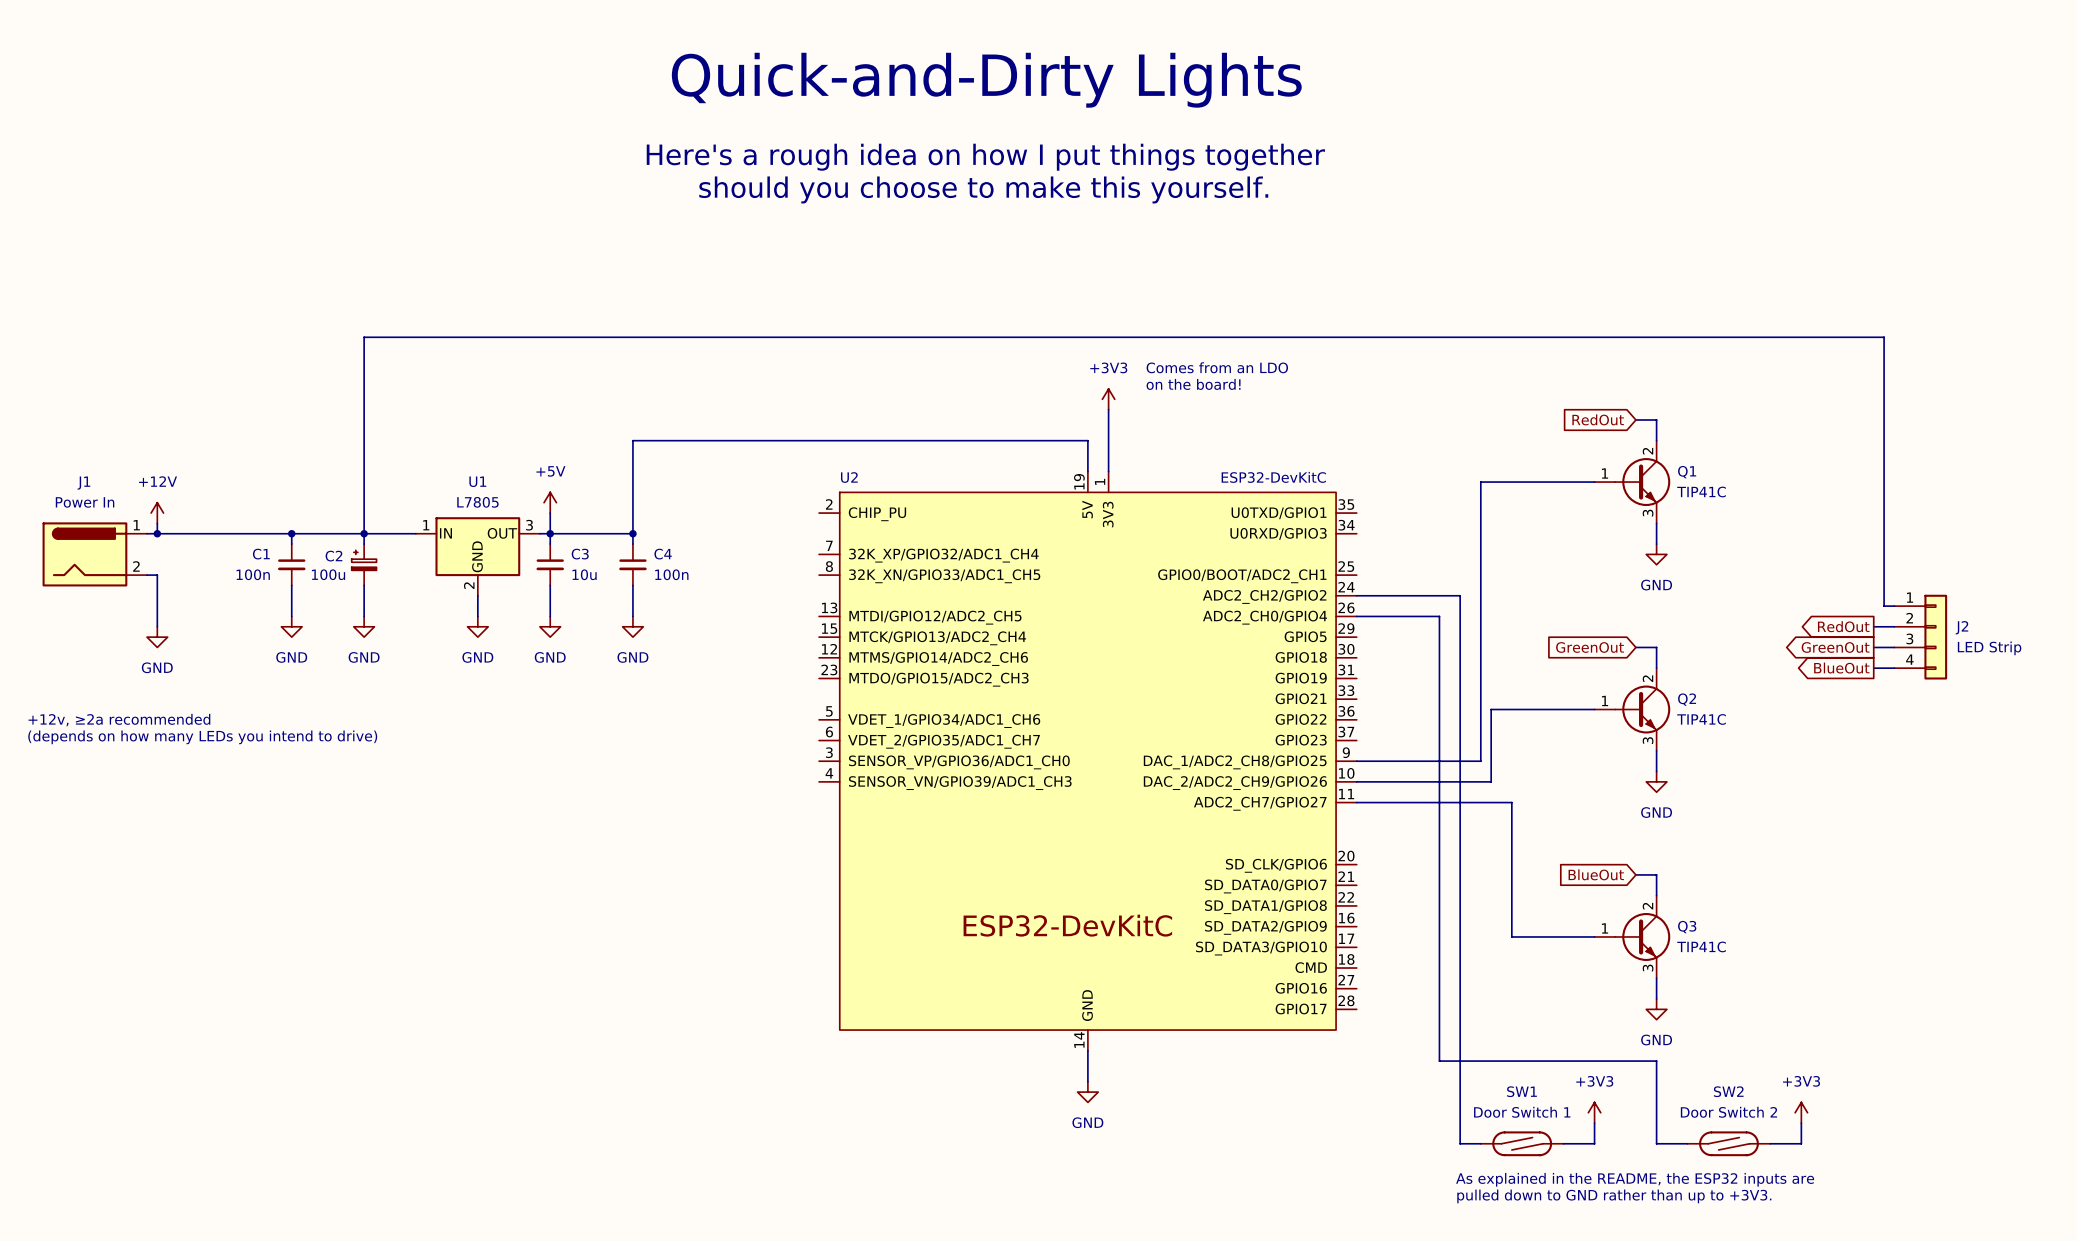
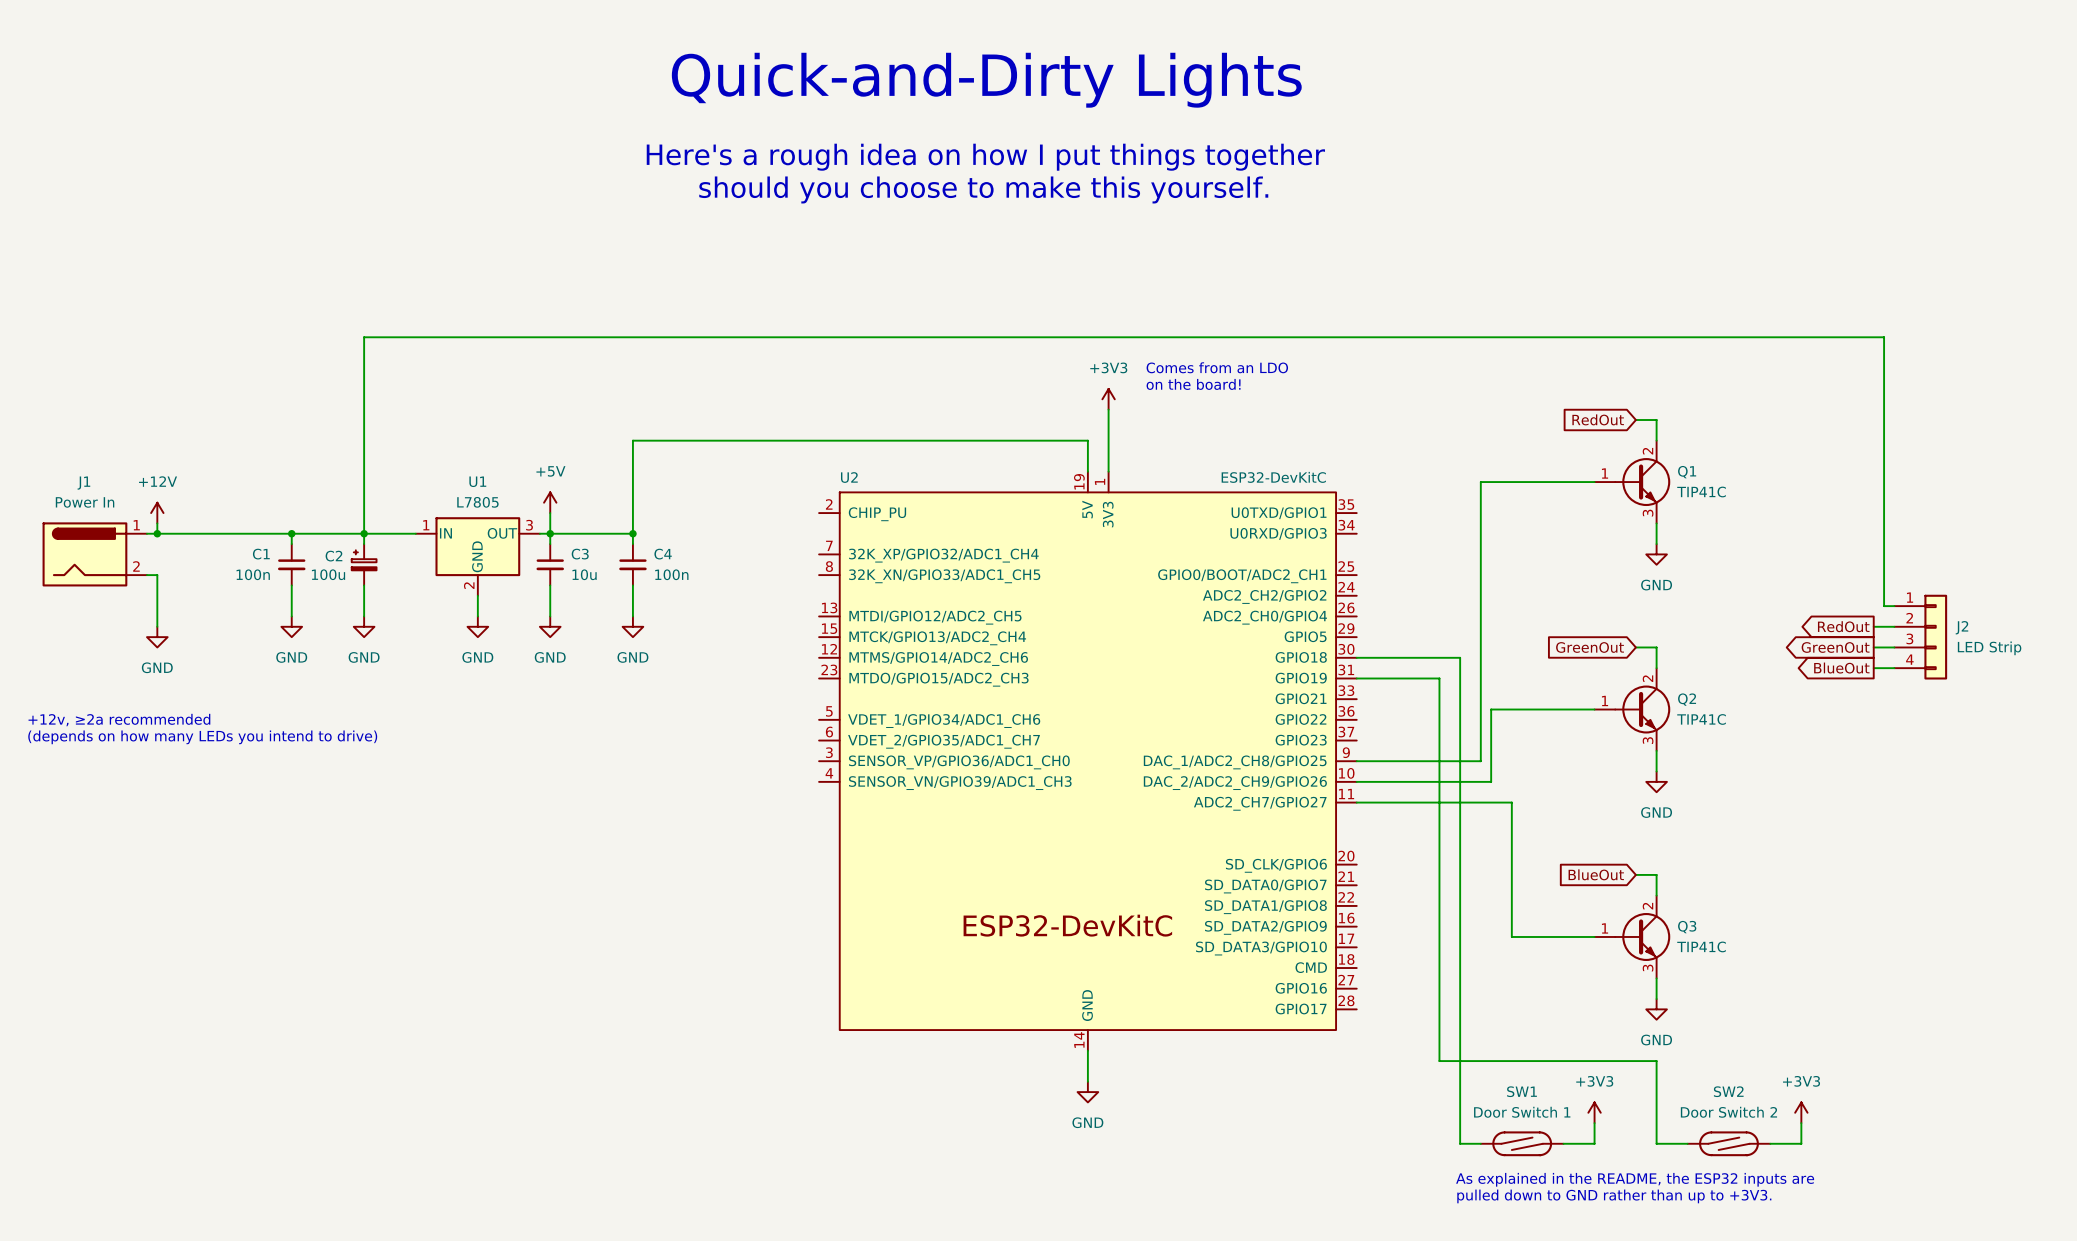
wire: (1356, 595) (1460, 595) (1460, 657) -> (1356, 657) (1460, 657)
wire: (1356, 616) (1439, 616) (1439, 678) -> (1356, 678) (1439, 678)

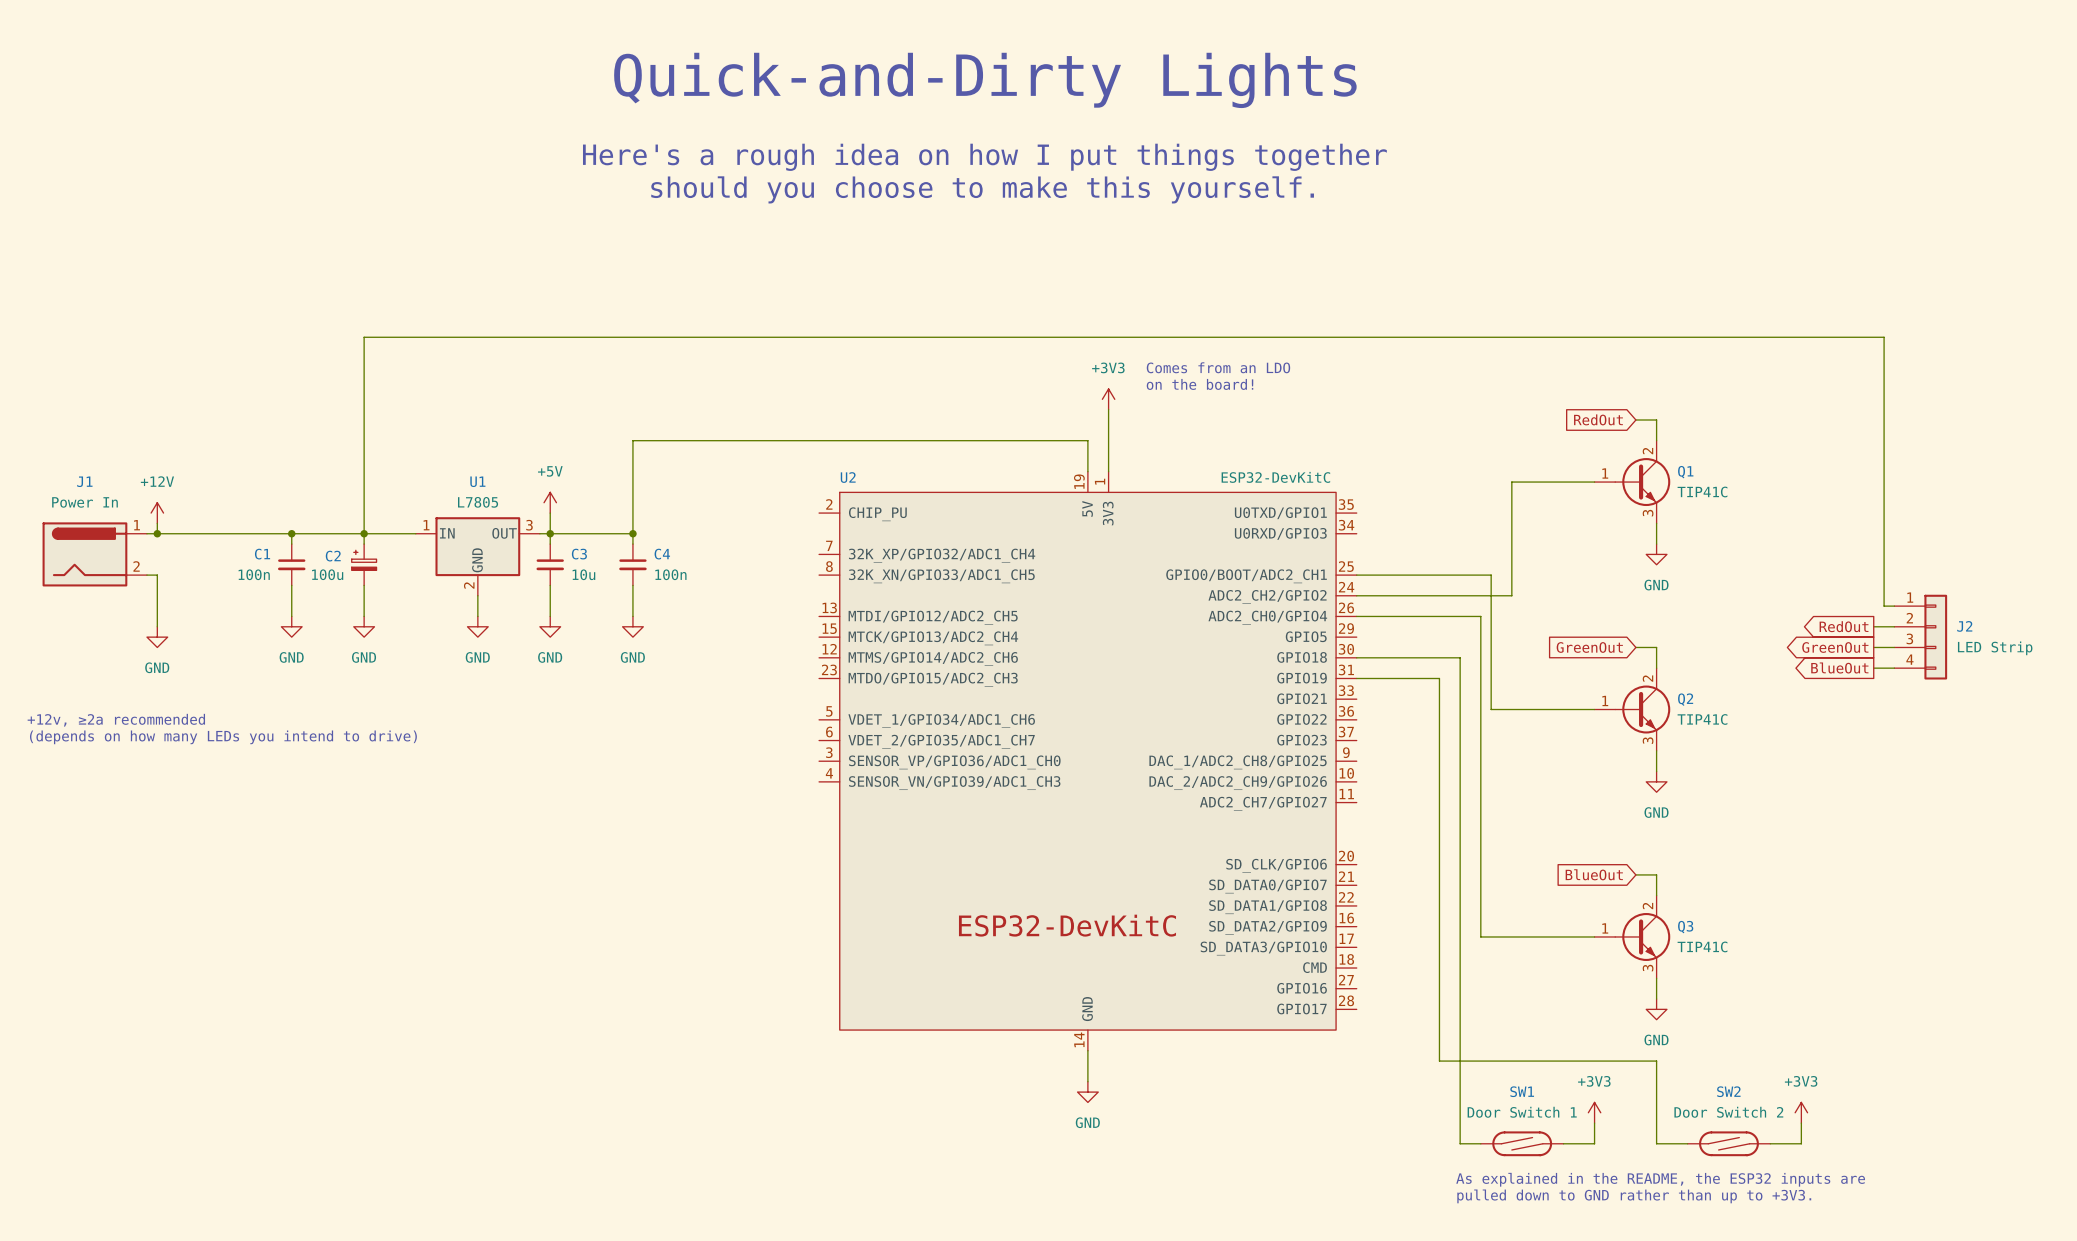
wire: (1511, 482) (1480, 482) (1480, 616) -> (1511, 482) (1511, 595) (1356, 595)
wire: (1491, 709) (1491, 781) (1356, 781) -> (1491, 709) (1491, 575) (1356, 575)
wire: (1356, 761) (1480, 761) -> (1356, 616) (1480, 616)
wire: (1356, 802) (1511, 802) (1511, 936) -> (1480, 761) (1480, 936) (1511, 936)

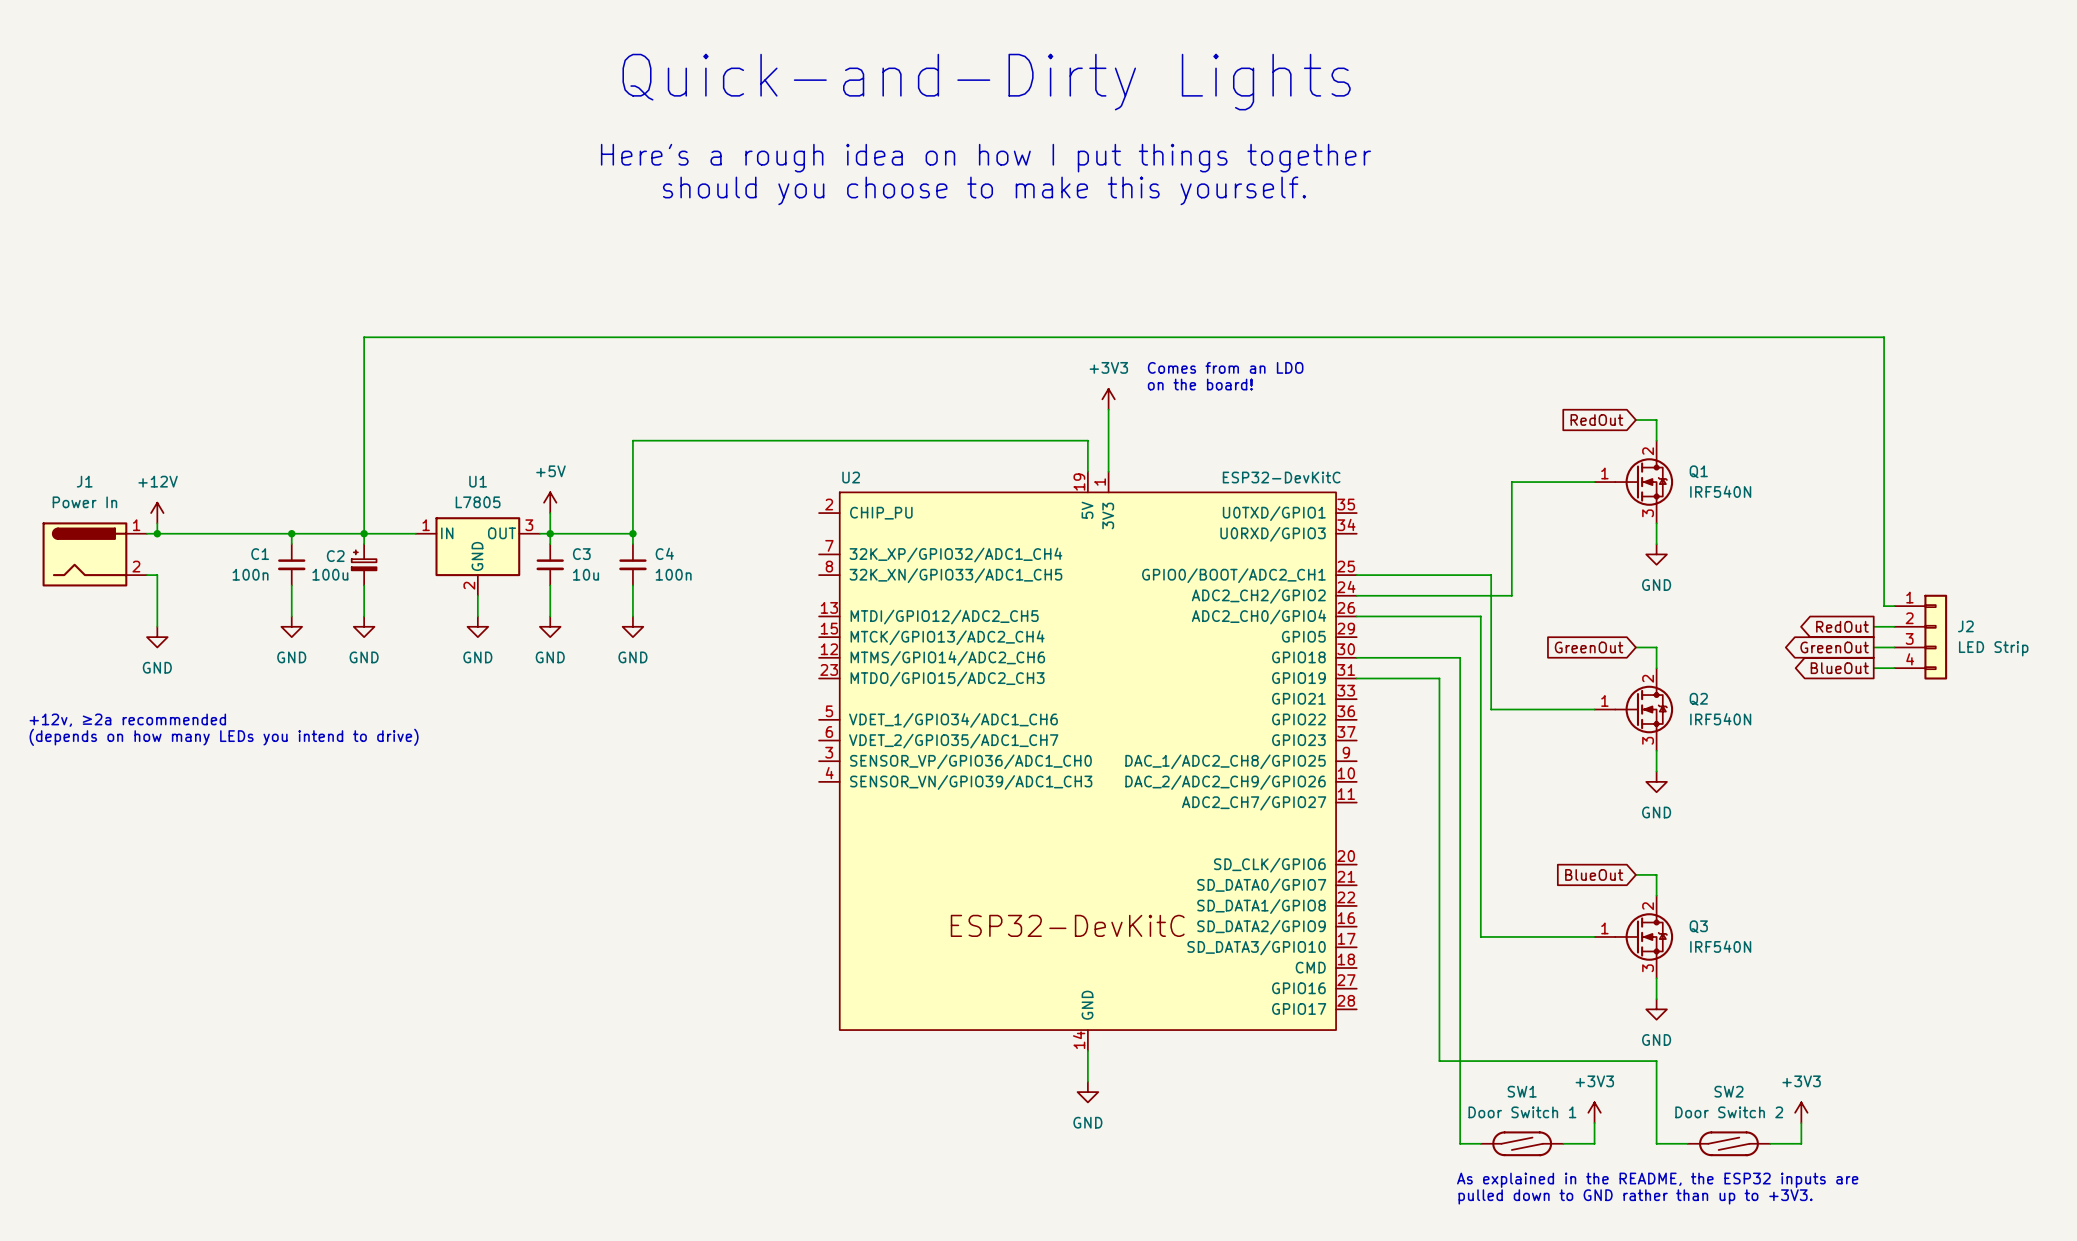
Q1 symbol: [1594, 440, 1671, 524] -> [1594, 440, 1674, 524]
Q1 value: TIP41C (1702, 491) -> IRF540N (1720, 491)
Q2 symbol: [1594, 668, 1671, 751] -> [1594, 668, 1674, 751]
Q2 value: TIP41C (1702, 719) -> IRF540N (1720, 719)
Q3 symbol: [1594, 895, 1671, 979] -> [1594, 895, 1674, 979]
Q3 value: TIP41C (1702, 946) -> IRF540N (1720, 946)

